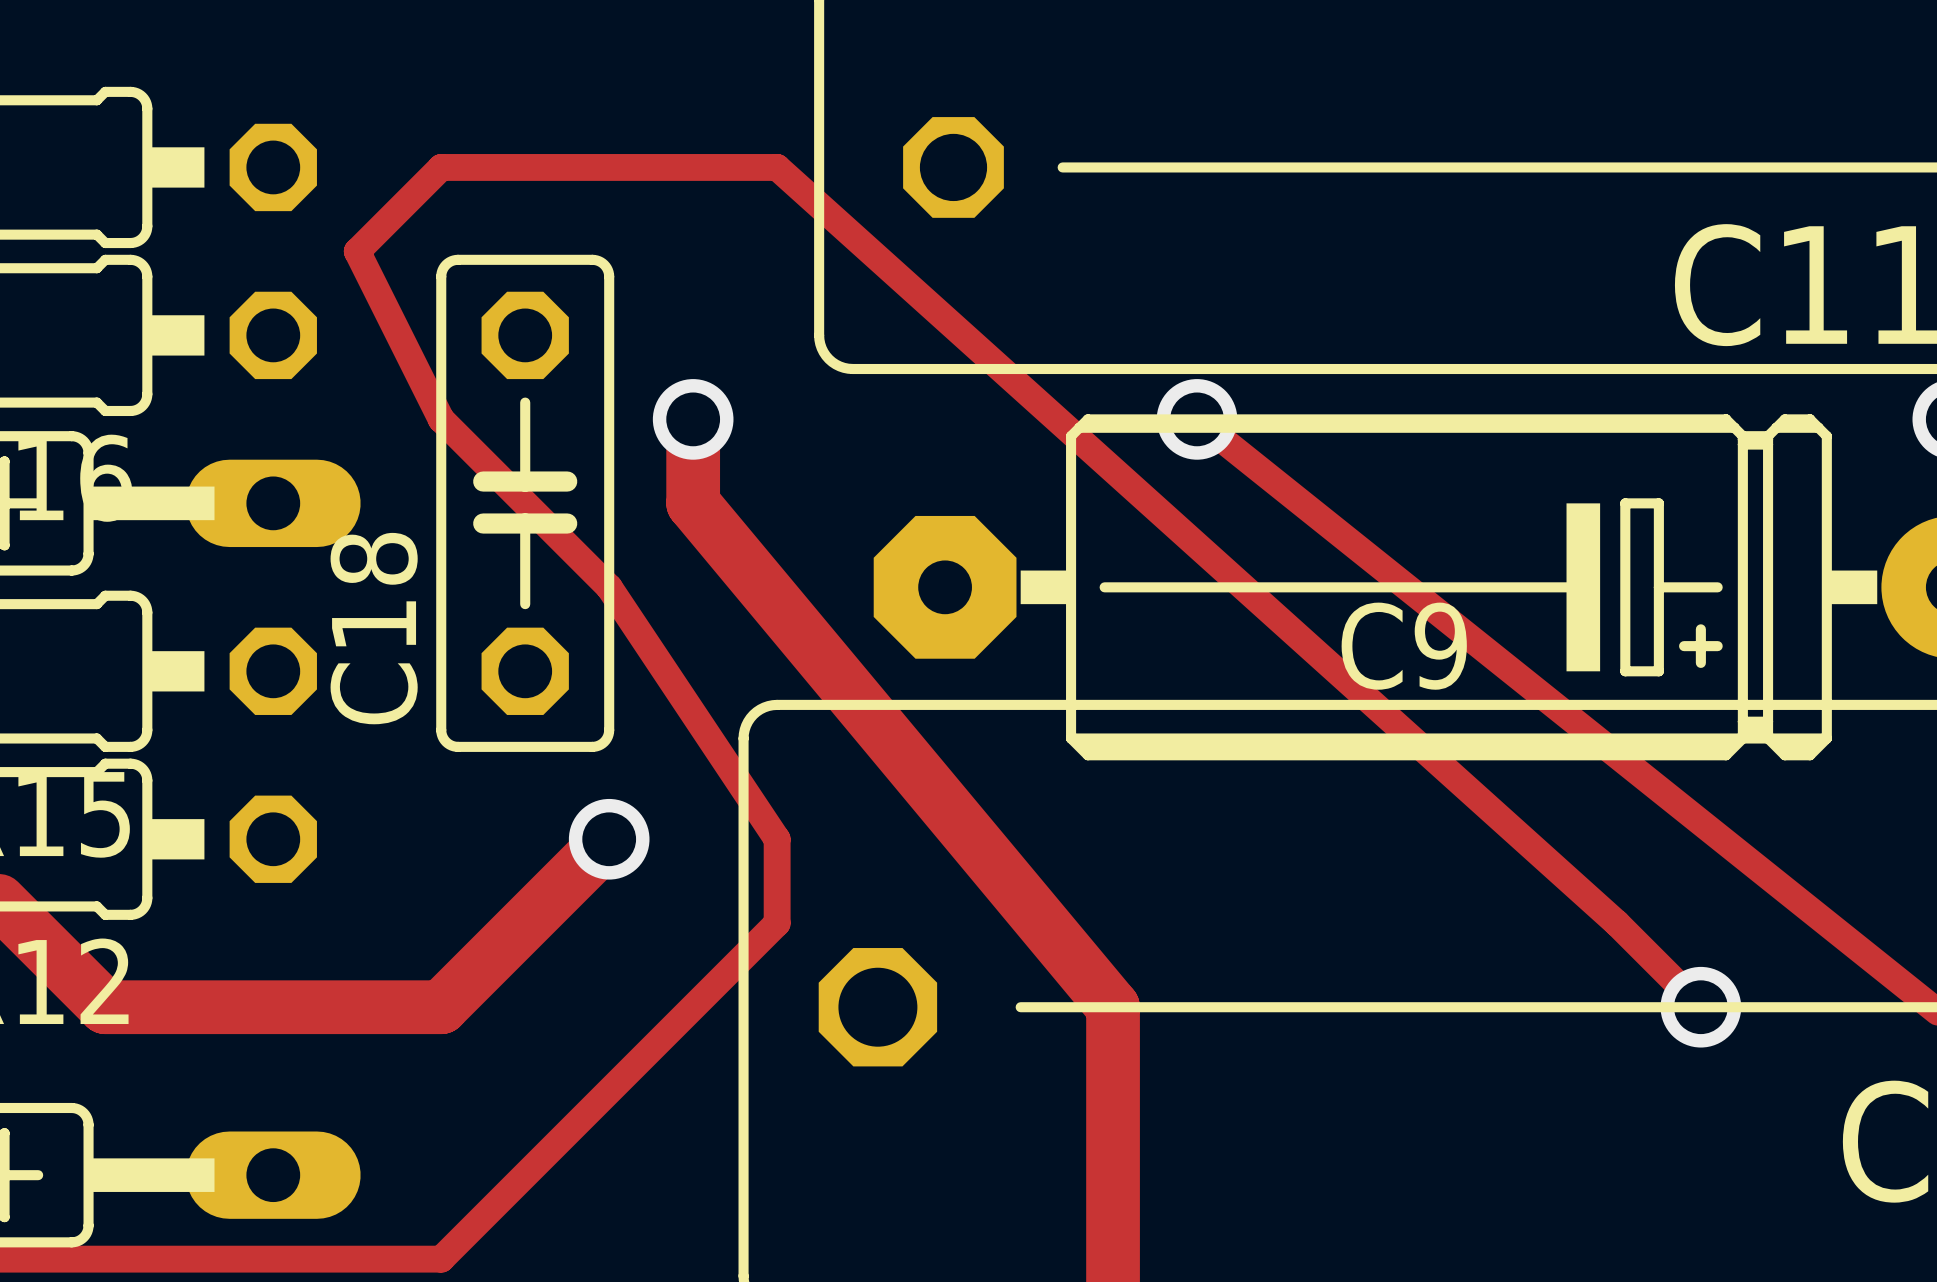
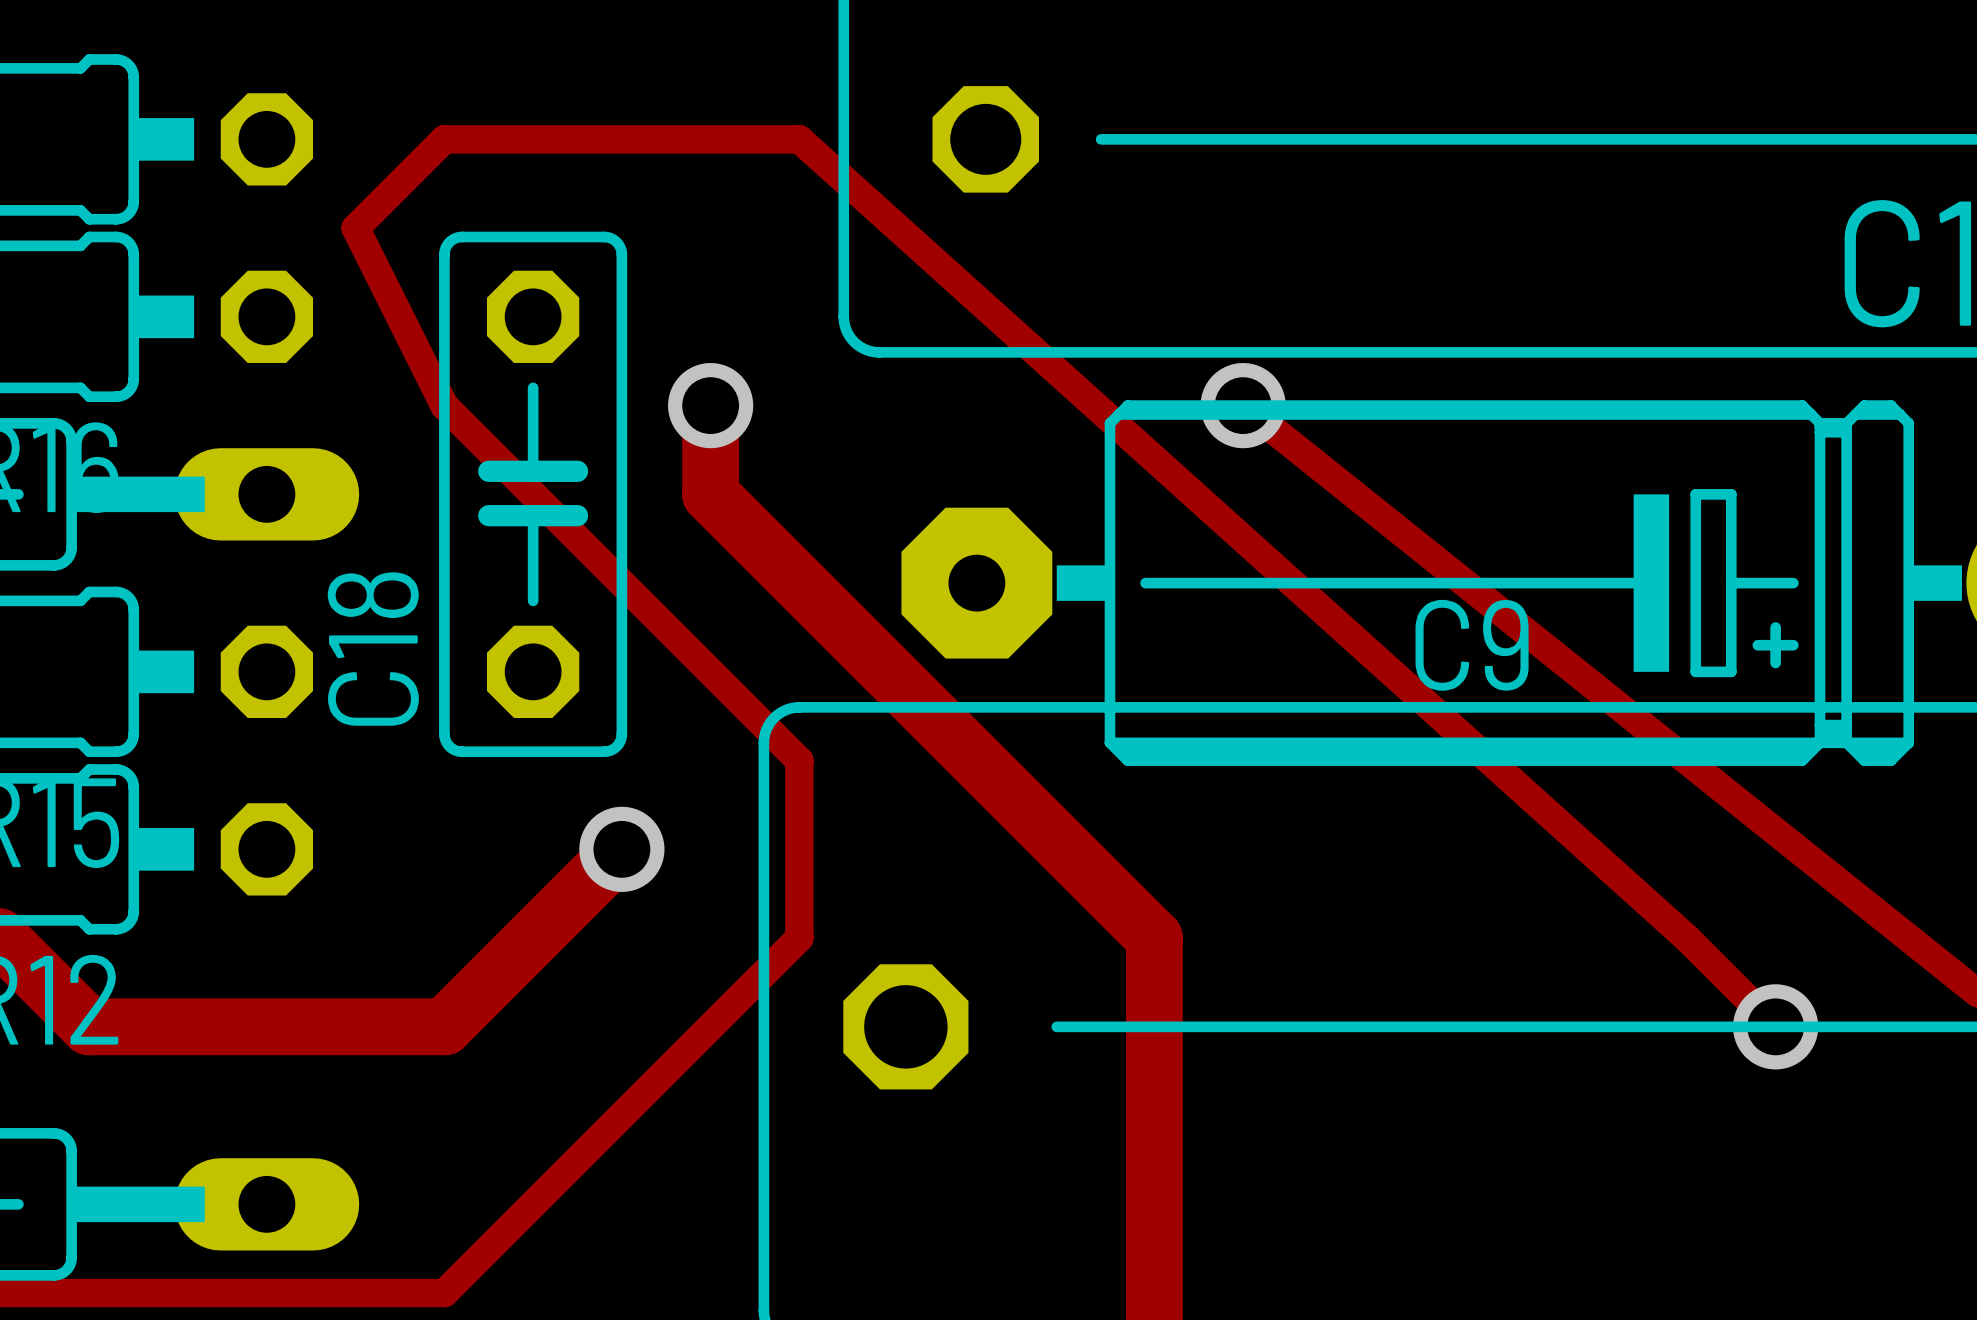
track: (693, 503) (1113, 1007) -> (710, 494) (1154, 938) (1154, 1026)
track: (609, 587) (777, 839) -> (621, 583) (799, 760) (799, 849)

